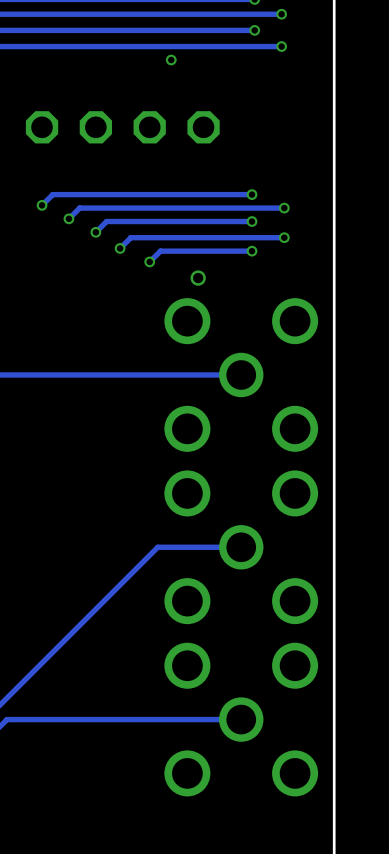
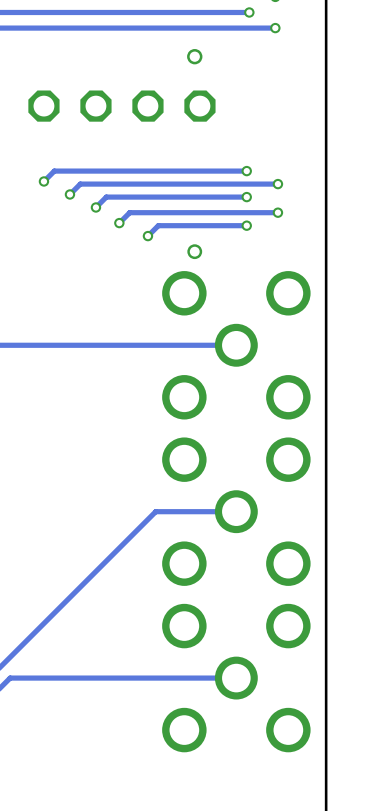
via: (171, 60) -> none
via: none -> (194, 56)

